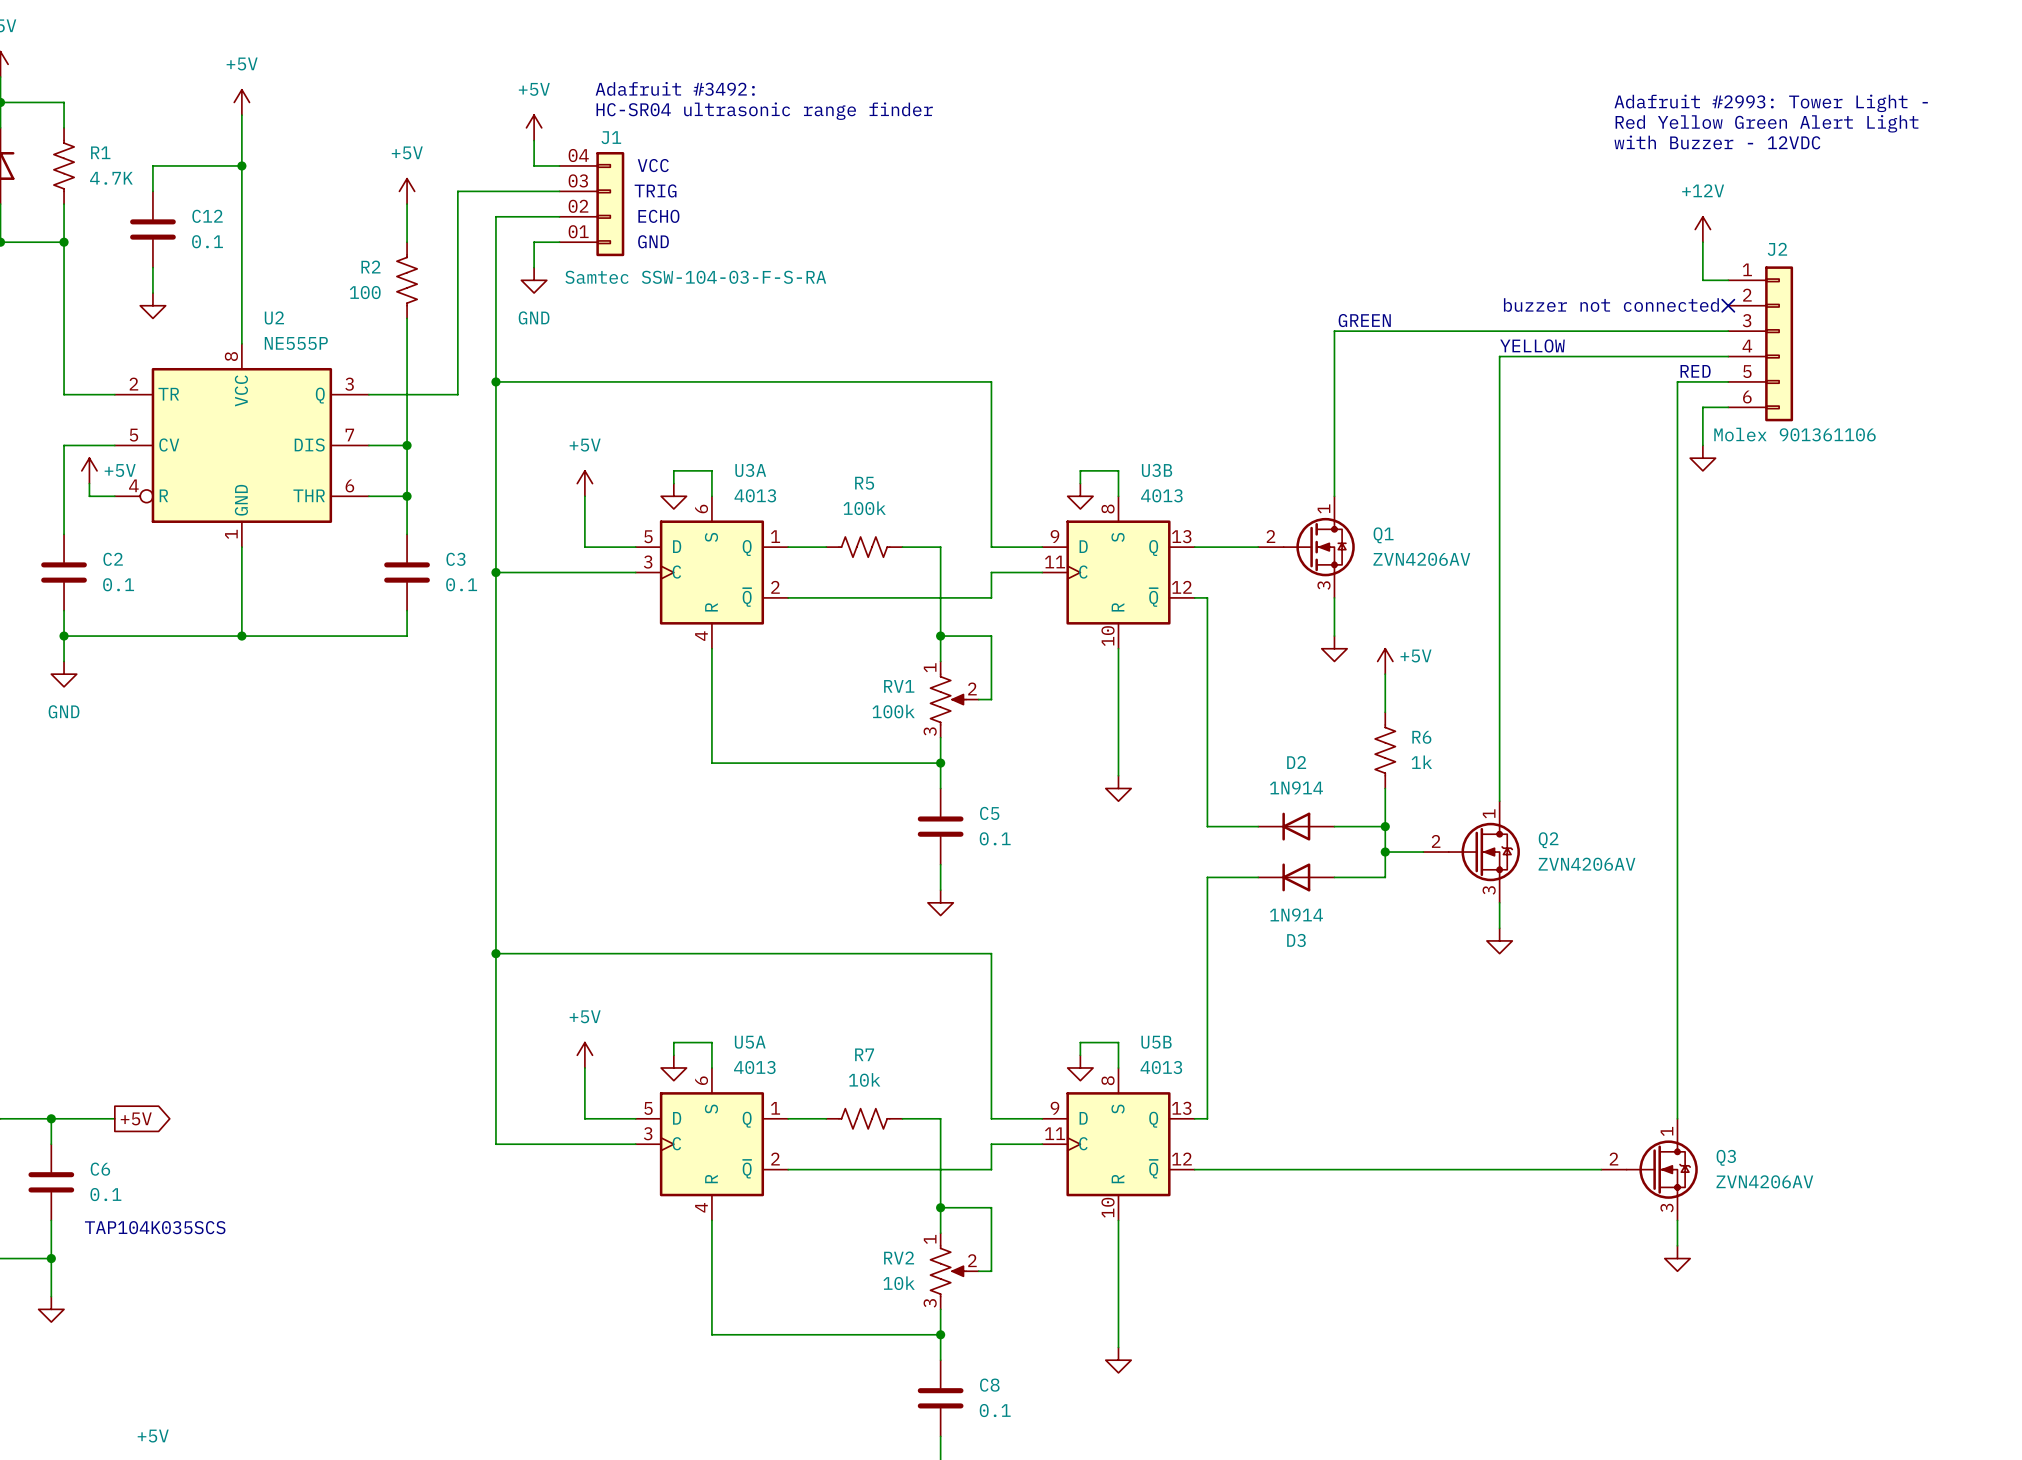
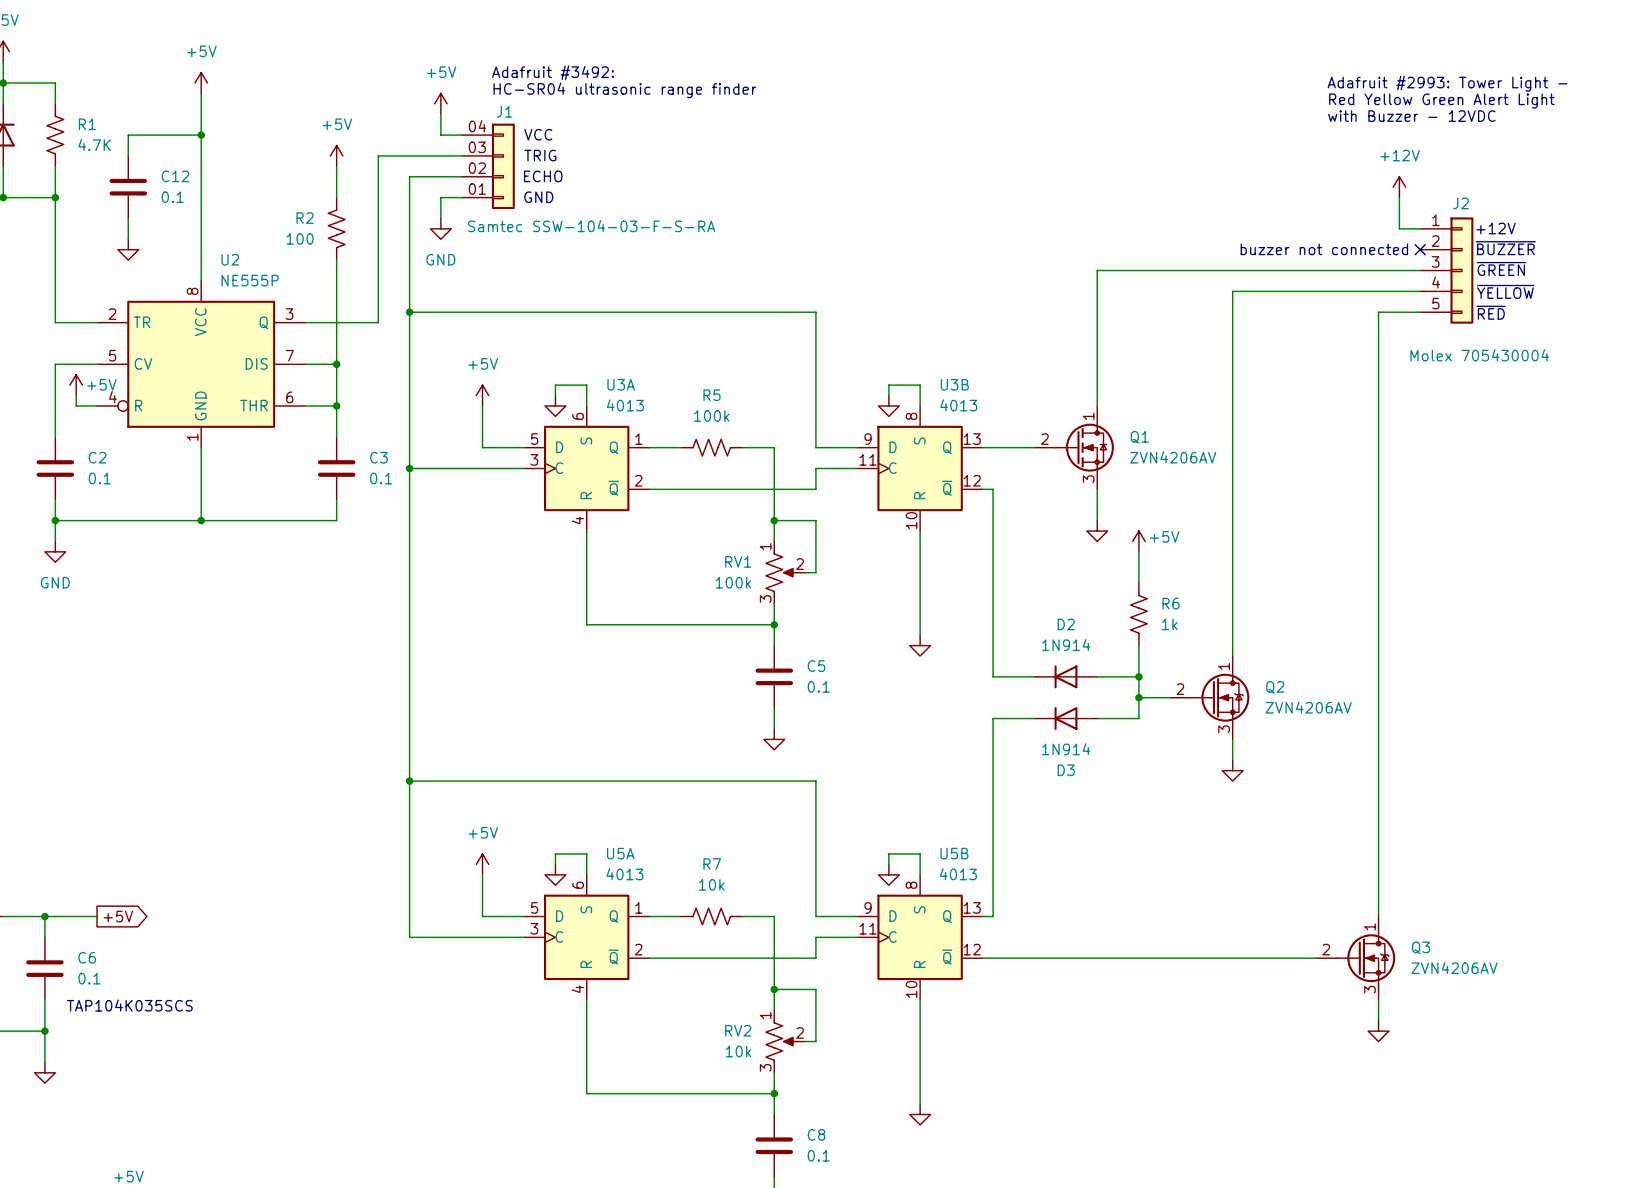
J2 symbol: [1728, 266, 1794, 422] -> [1420, 217, 1474, 324]
text: none -> +12V (1495, 228)
text: none -> ~{BUZZER} (1505, 248)
text: GREEN (1364, 320) -> none
text: none -> ~{GREEN} (1501, 268)
text: YELLOW (1532, 345) -> none
text: none -> ~{YELLOW} (1505, 291)
text: RED (1695, 371) -> none
text: none -> ~{RED} (1491, 312)
wire: (1728, 407) (1702, 407) (1702, 445) -> none
J2 value: Molex 901361106 (1794, 434) -> Molex 705430004 (1479, 355)
power symbol: (1702, 458) -> none

